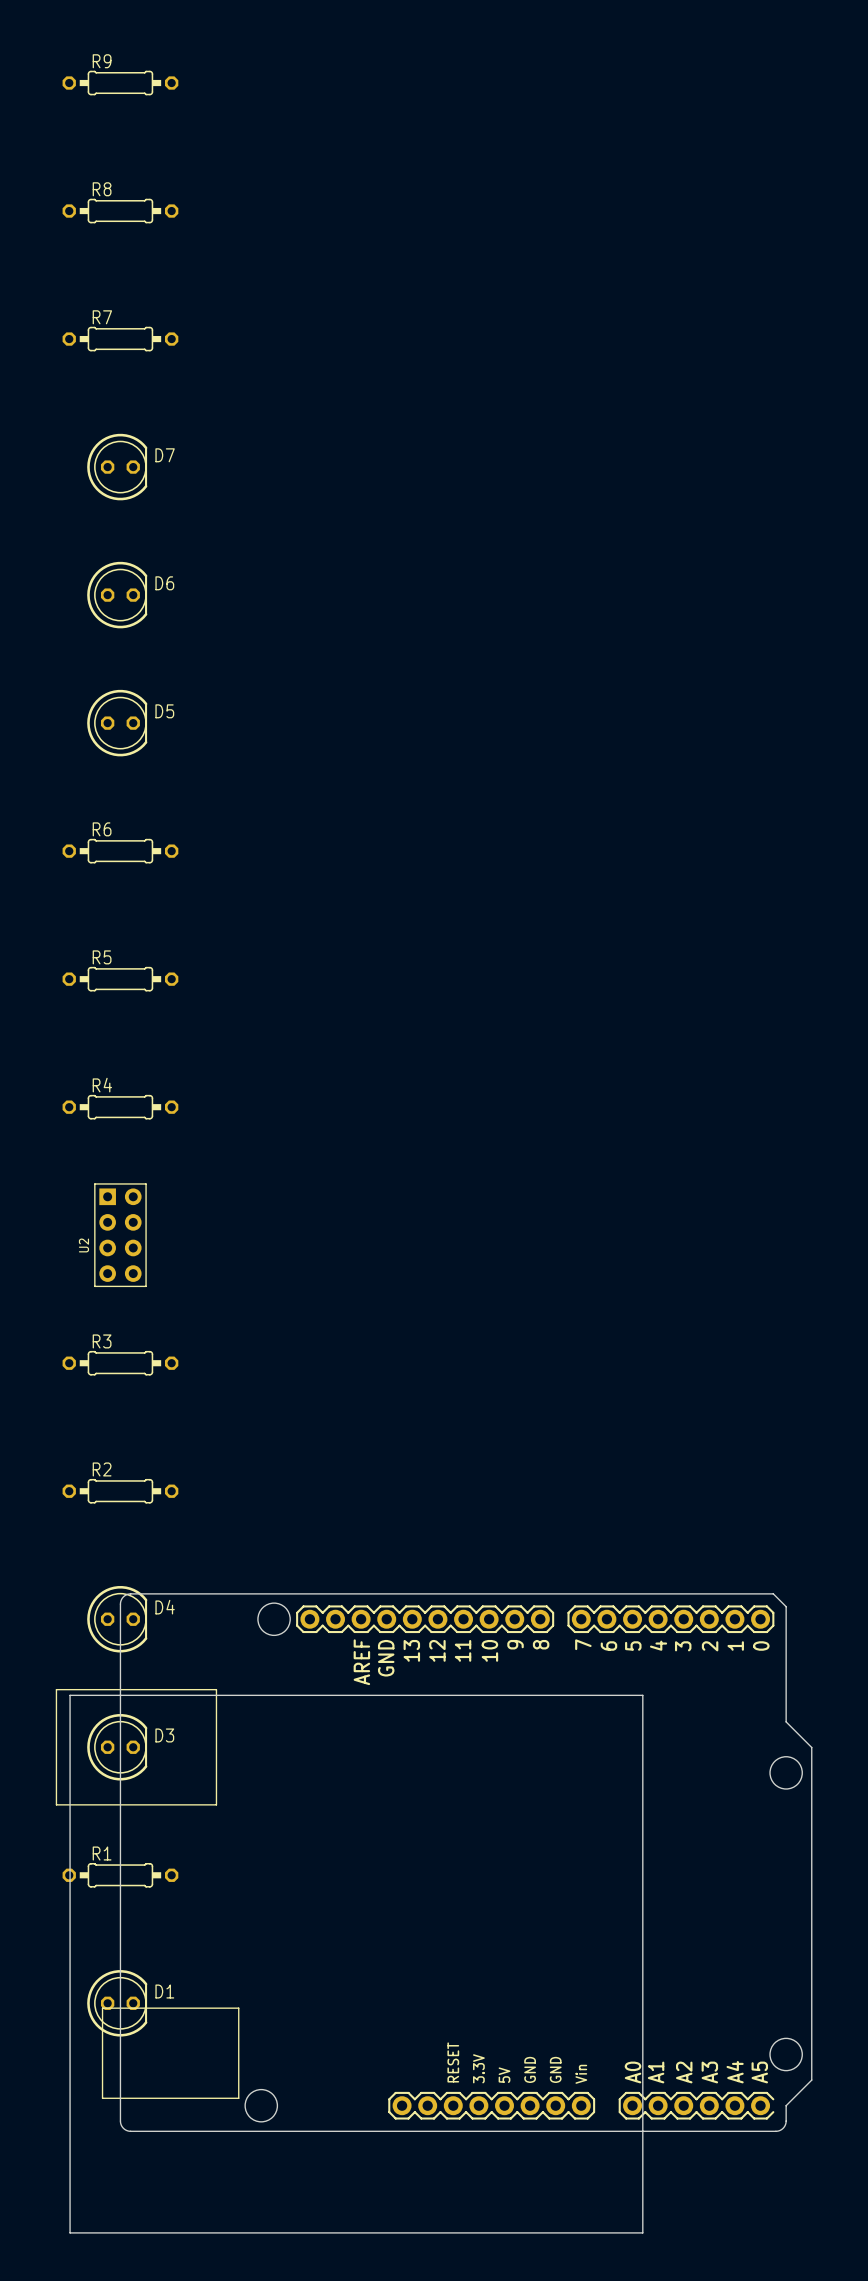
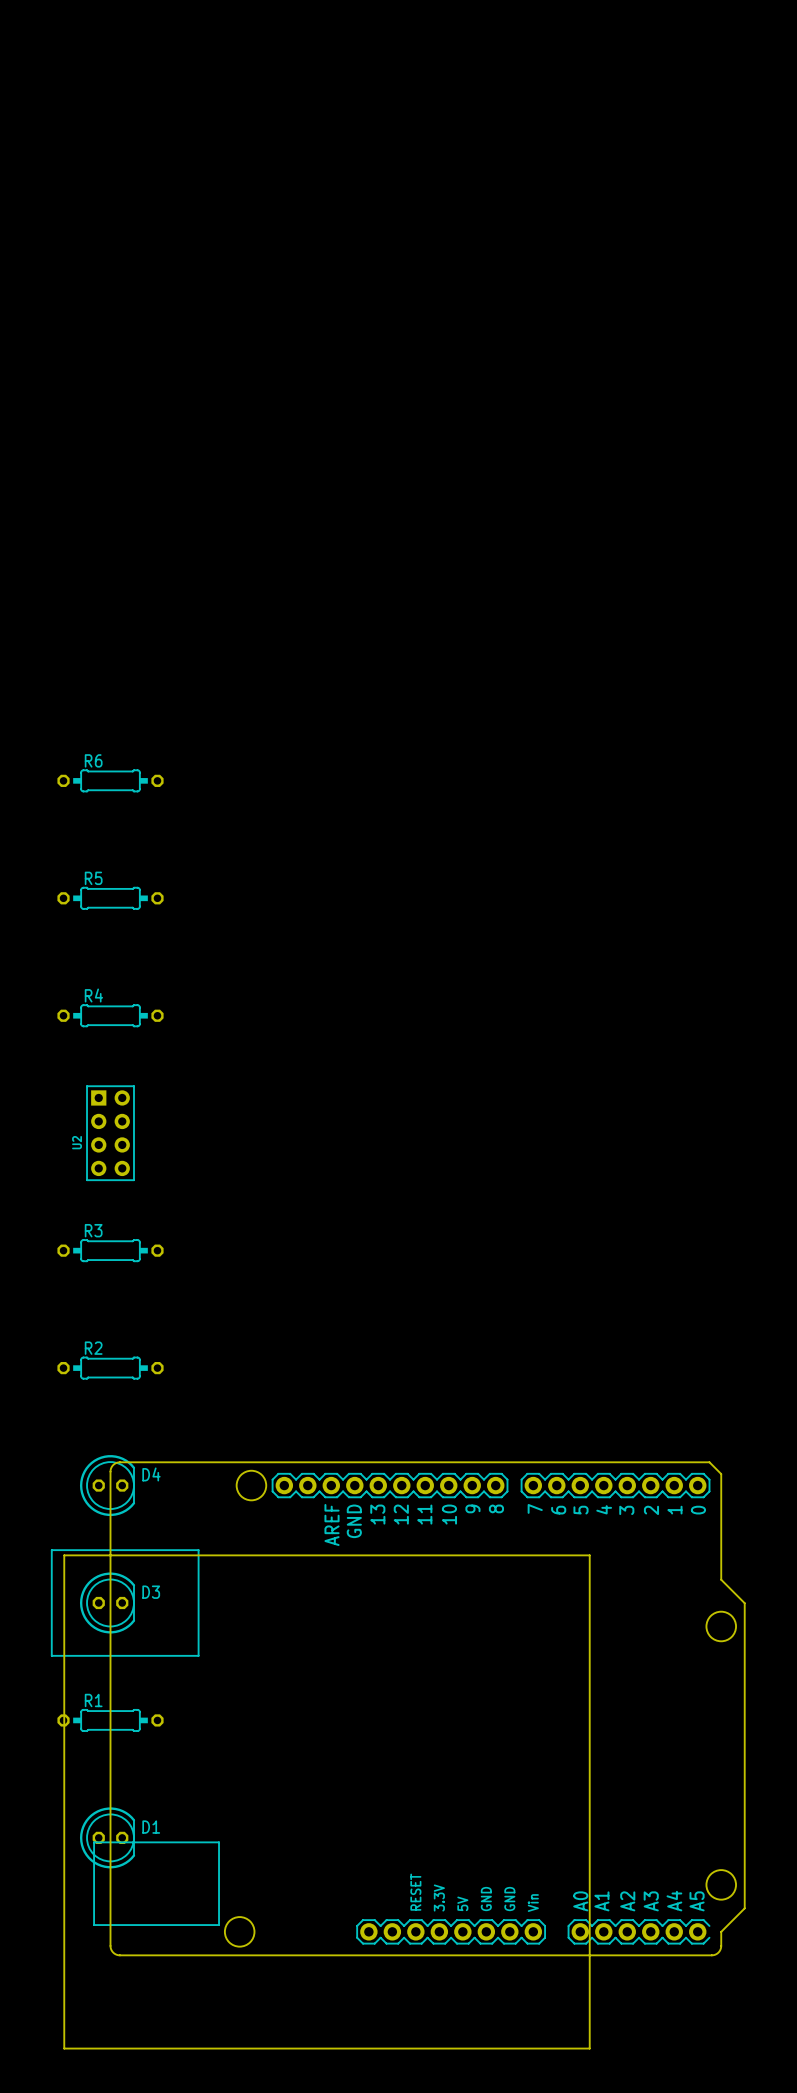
R9: (120, 83) -> none
R8: (120, 211) -> none
R7: (120, 339) -> none
D7: (117, 467) -> none
D6: (117, 595) -> none
D5: (117, 723) -> none

